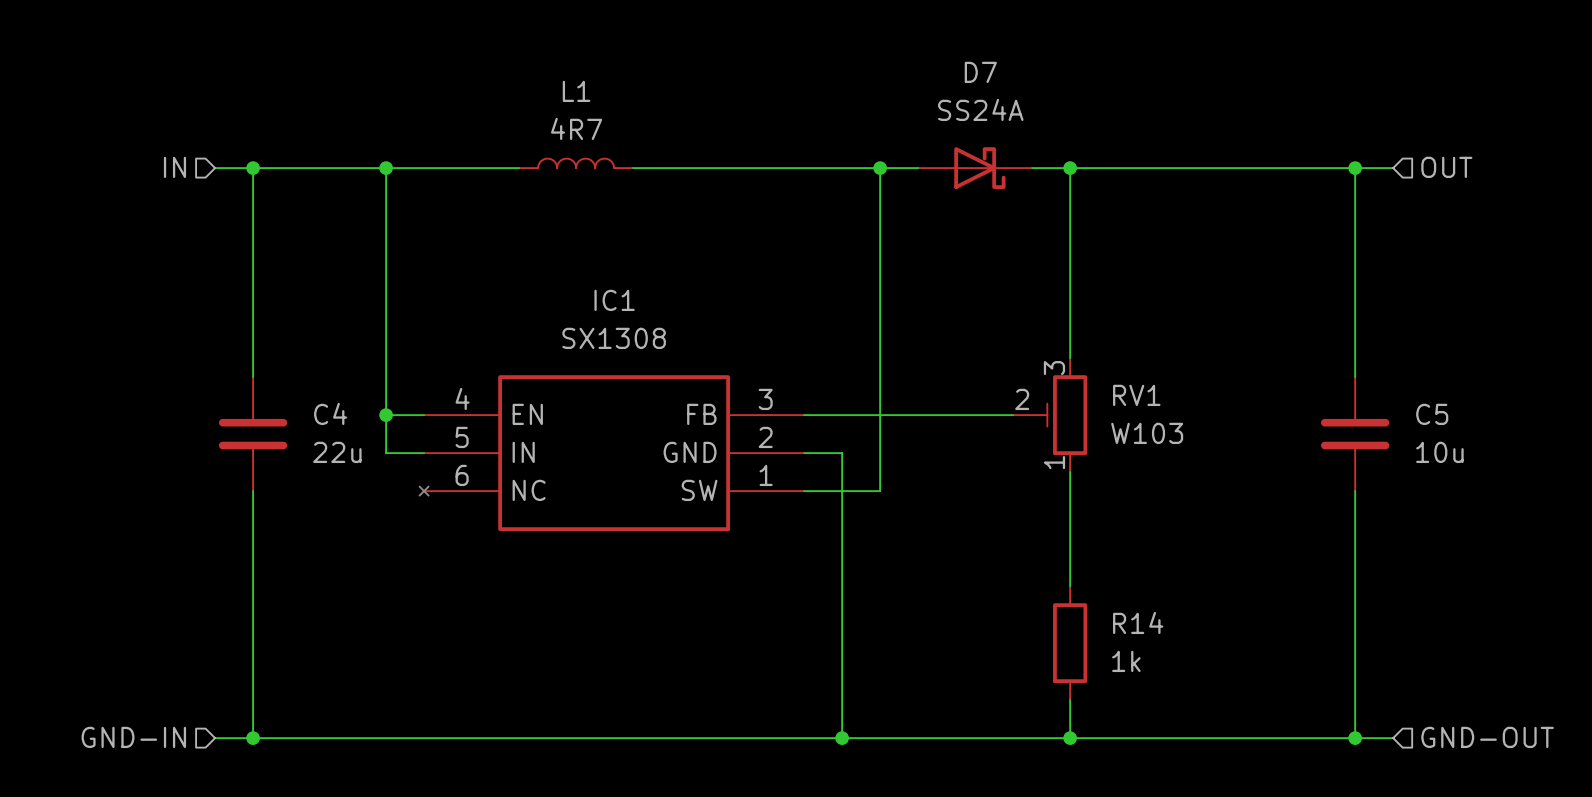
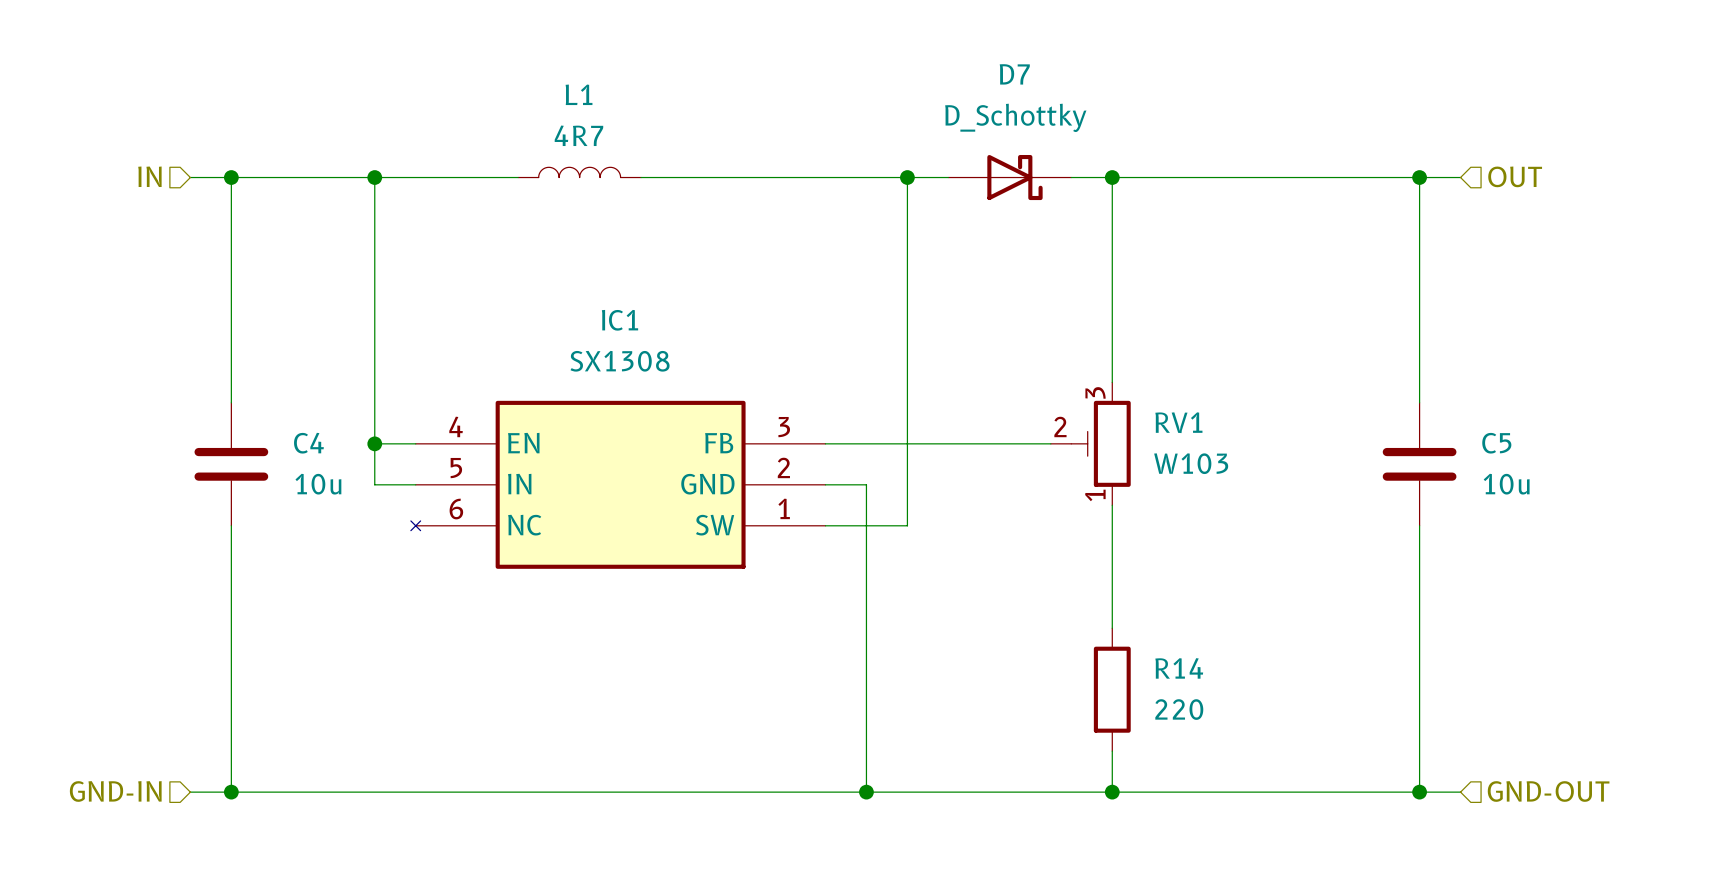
D7 value: SS24A (980, 109) -> D_Schottky (1015, 117)
C4 value: 22u (337, 452) -> 10u (318, 484)
R14 value: 1k (1126, 661) -> 220 (1179, 709)

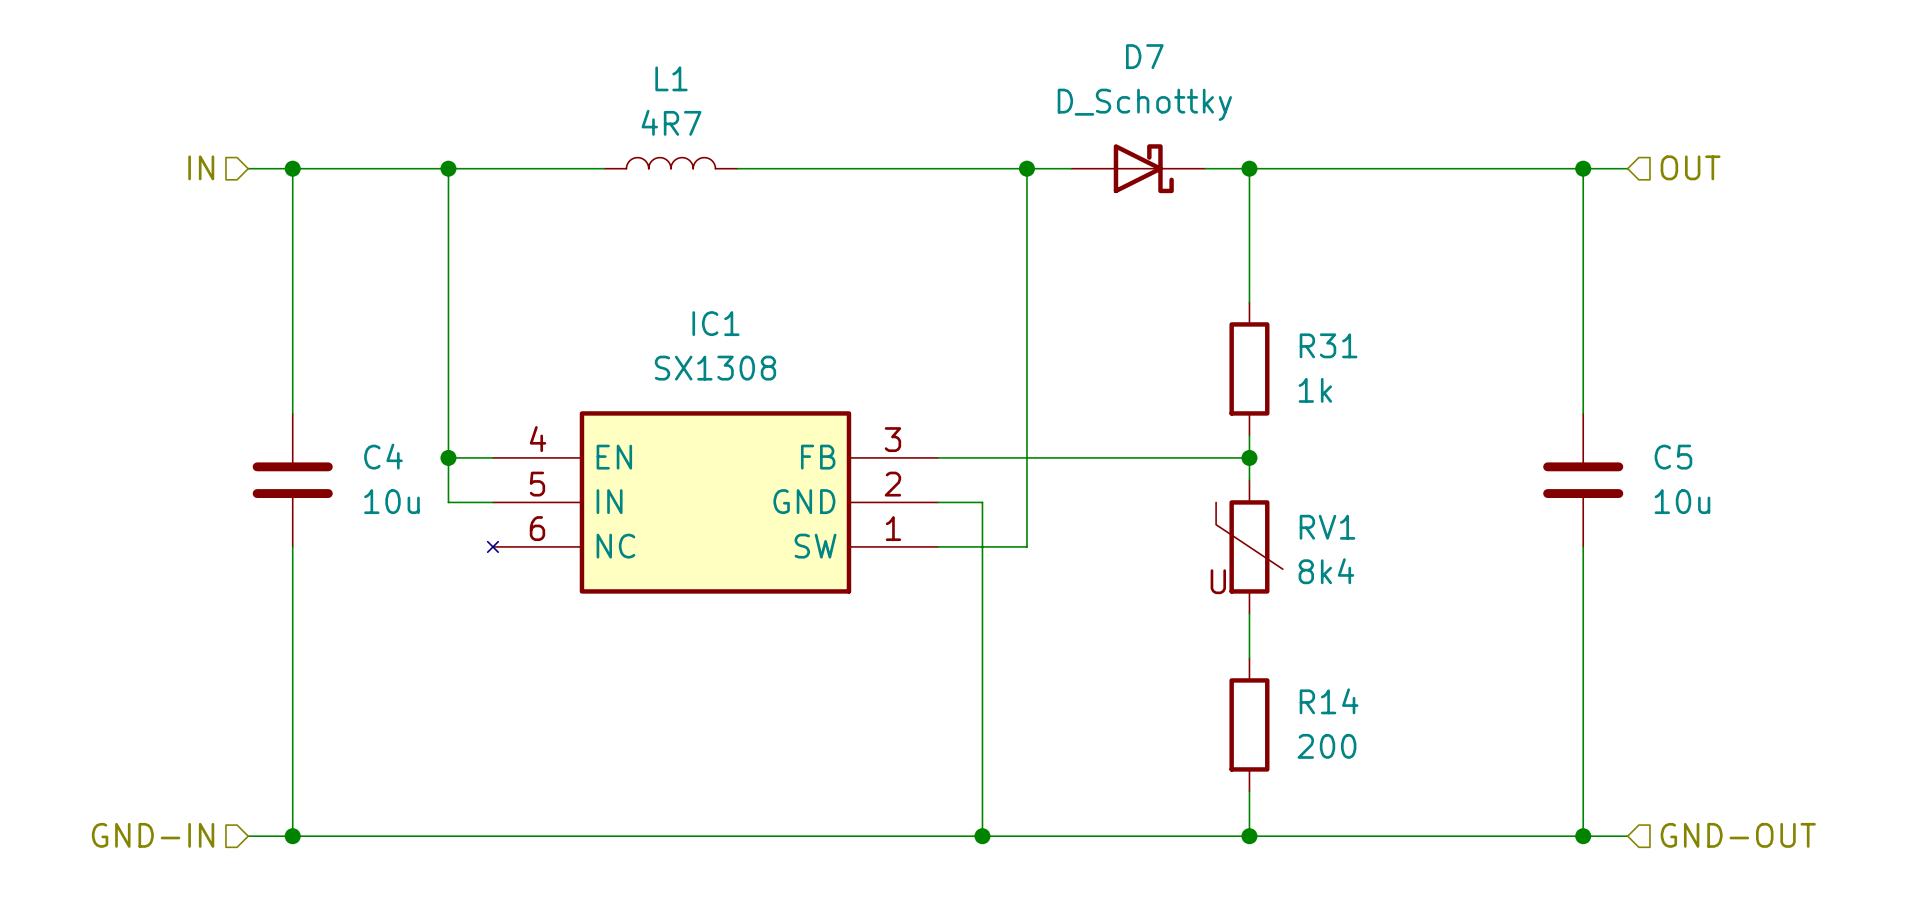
wire: (1112, 300) (1112, 382) -> none
R31: none -> 1k (1249, 368)
RV1 symbol: [1050, 382, 1131, 506] -> [1216, 480, 1283, 614]
wire: none -> (1249, 435) (1249, 480)
junction: none -> (1249, 457)
RV1 value: W103 (1191, 463) -> 8k4 (1326, 571)
wire: (1112, 505) (1112, 587) -> none
R14 value: 220 (1179, 709) -> 200 (1326, 746)

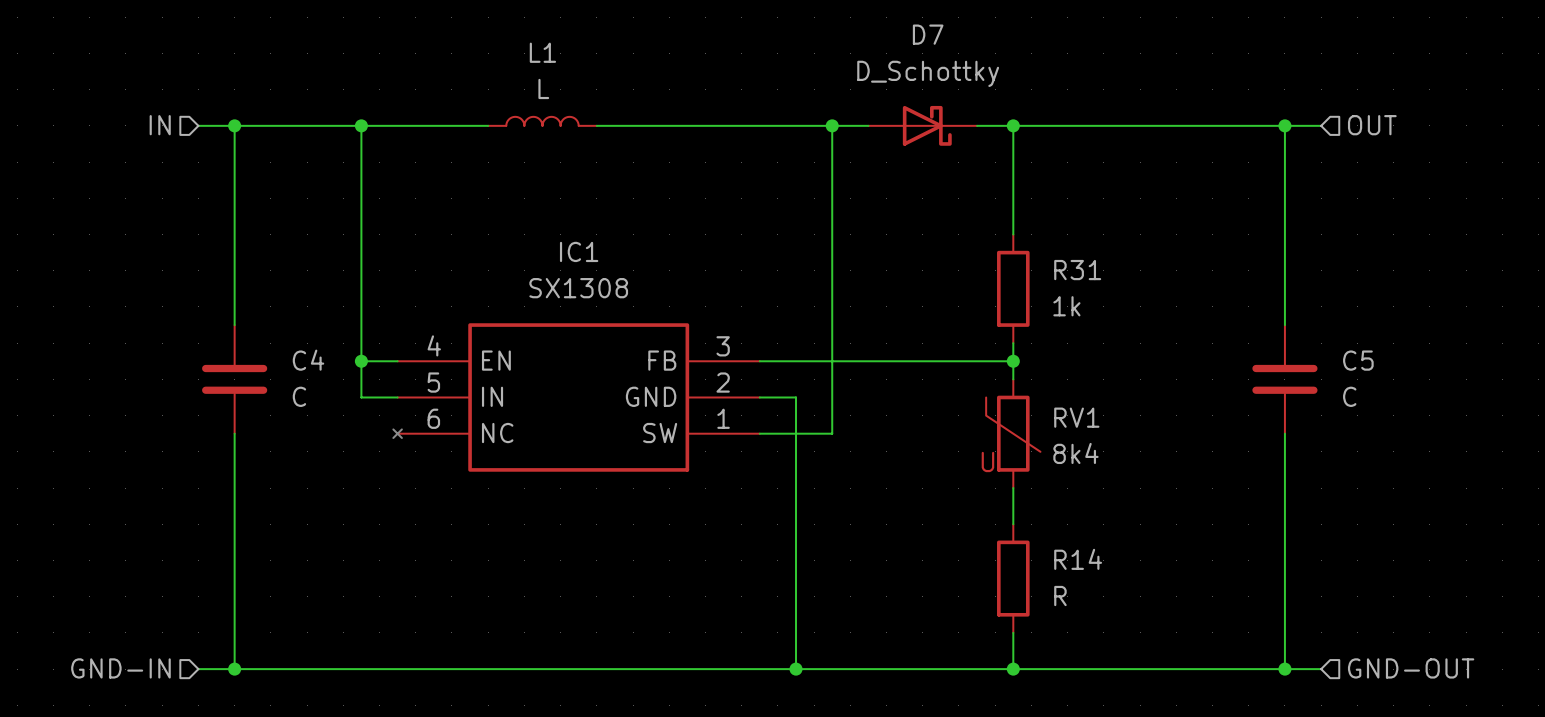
L1 value: 4R7 (671, 122) -> L (543, 88)
C4 value: 10u (391, 501) -> C (299, 396)
C5 value: 10u (1682, 501) -> C (1349, 396)
R14 value: 200 (1326, 746) -> R (1060, 596)

